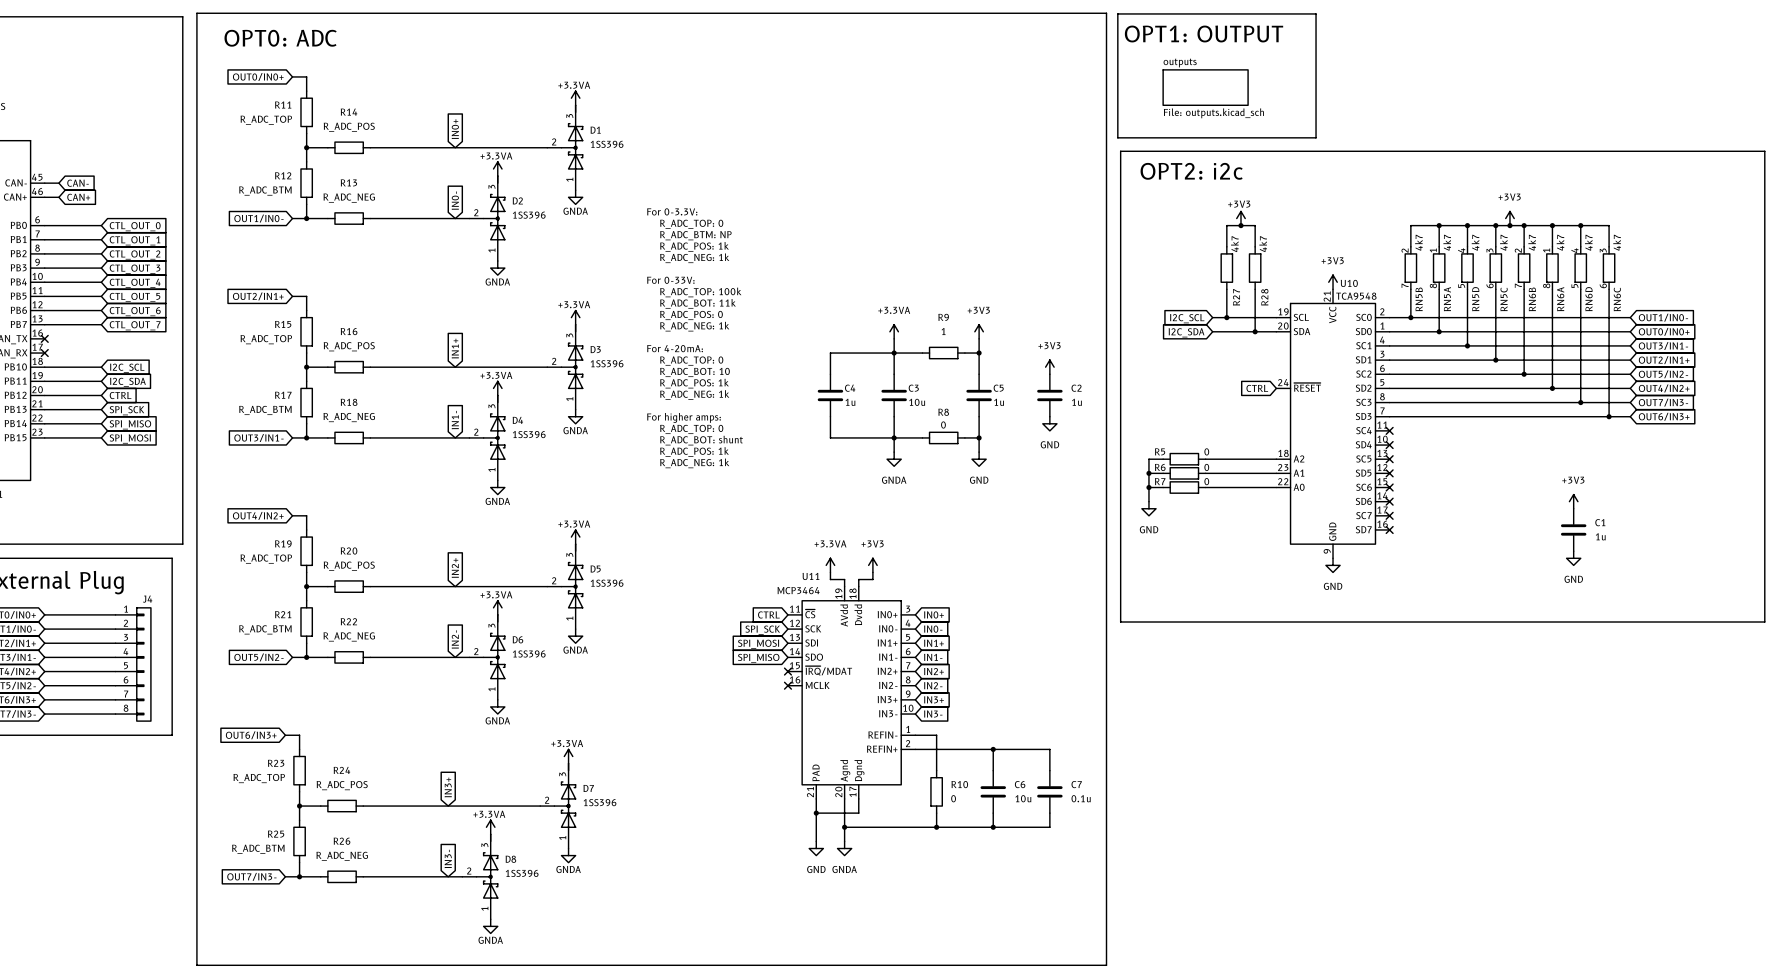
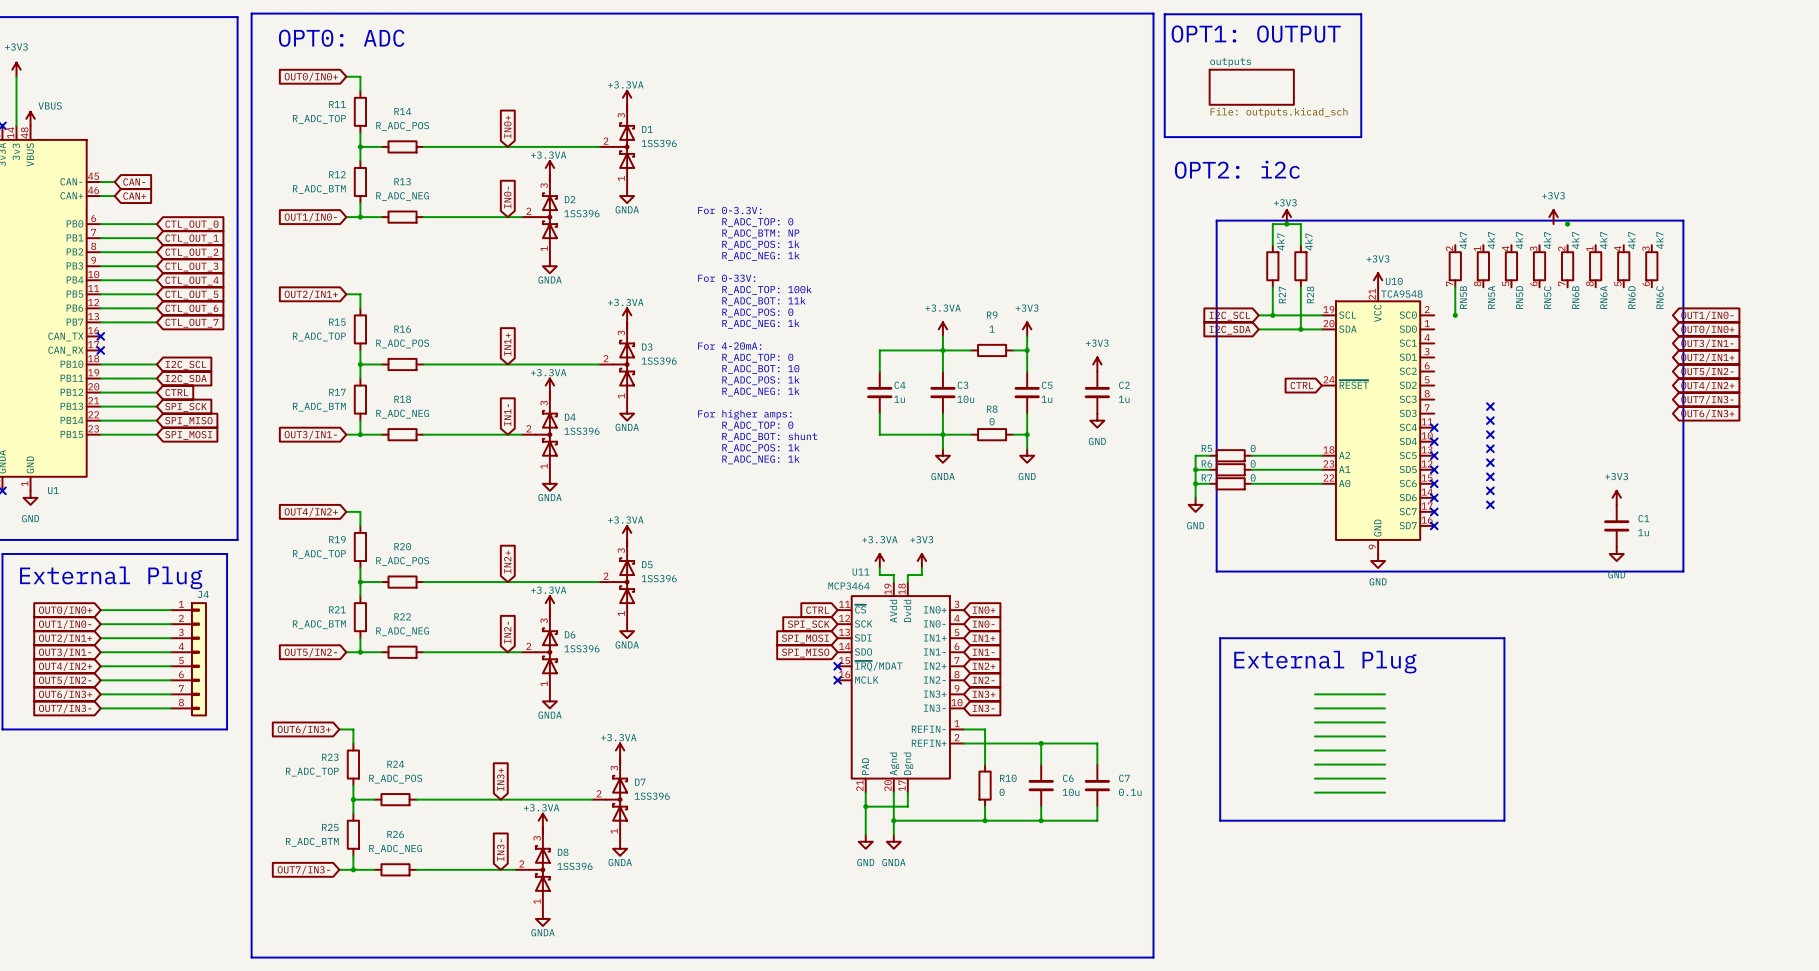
line: (1120, 151) (1764, 151) (1764, 622) (1120, 622) (1120, 151) -> (1216, 220) (1216, 571) (1683, 571) (1683, 220) (1216, 220)
wire: (1439, 225) (1439, 246) -> none
junction: (1439, 225) -> none
wire: (1467, 225) (1467, 246) -> none
junction: (1467, 225) -> none
wire: (1495, 225) (1495, 246) -> none
junction: (1495, 225) -> none
junction: (1509, 225) -> none
wire: (1524, 225) (1524, 246) -> none
wire: (1552, 225) (1552, 246) -> none
junction: (1552, 225) -> none
wire: (1580, 225) (1580, 246) -> none
junction: (1580, 225) -> none
wire: (1410, 246) (1410, 225) (1609, 225) (1609, 246) -> none
wire: (1439, 289) (1439, 331) -> none
wire: (1467, 289) (1467, 345) -> none
wire: (1495, 289) (1495, 360) -> none
wire: (1524, 289) (1524, 374) -> none
wire: (1552, 289) (1552, 388) -> none
wire: (1580, 289) (1580, 402) -> none
wire: (1609, 289) (1609, 416) -> none
wire: (1389, 317) (1630, 317) -> none
wire: (1389, 331) (1630, 331) -> none
junction: (1439, 331) -> none
wire: (1389, 345) (1630, 345) -> none
junction: (1467, 345) -> none
wire: (1389, 360) (1630, 360) -> none
junction: (1495, 360) -> none
wire: (1389, 374) (1630, 374) -> none
junction: (1524, 374) -> none
wire: (1389, 388) (1630, 388) -> none
junction: (1552, 388) -> none
wire: (1389, 402) (1630, 402) -> none
junction: (1580, 402) -> none
no-connect mark: none -> (1490, 406)
wire: (1389, 416) (1630, 416) -> none
junction: (1609, 416) -> none
no-connect mark: none -> (1490, 420)
no-connect mark: none -> (1490, 434)
no-connect mark: none -> (1490, 448)
no-connect mark: none -> (1490, 462)
no-connect mark: none -> (1490, 476)
no-connect mark: none -> (1490, 490)
no-connect mark: none -> (1490, 504)
line: none -> (1220, 638) (1504, 638) (1504, 820) (1220, 820) (1220, 638)
text: none -> External Plug (1325, 662)
wire: none -> (1314, 694) (1385, 694)
wire: none -> (1314, 708) (1385, 708)
wire: none -> (1314, 722) (1385, 722)
wire: none -> (1314, 736) (1385, 736)
wire: none -> (1314, 750) (1385, 750)
wire: none -> (1314, 764) (1385, 764)
wire: none -> (1314, 778) (1385, 778)
wire: none -> (1314, 792) (1385, 792)

